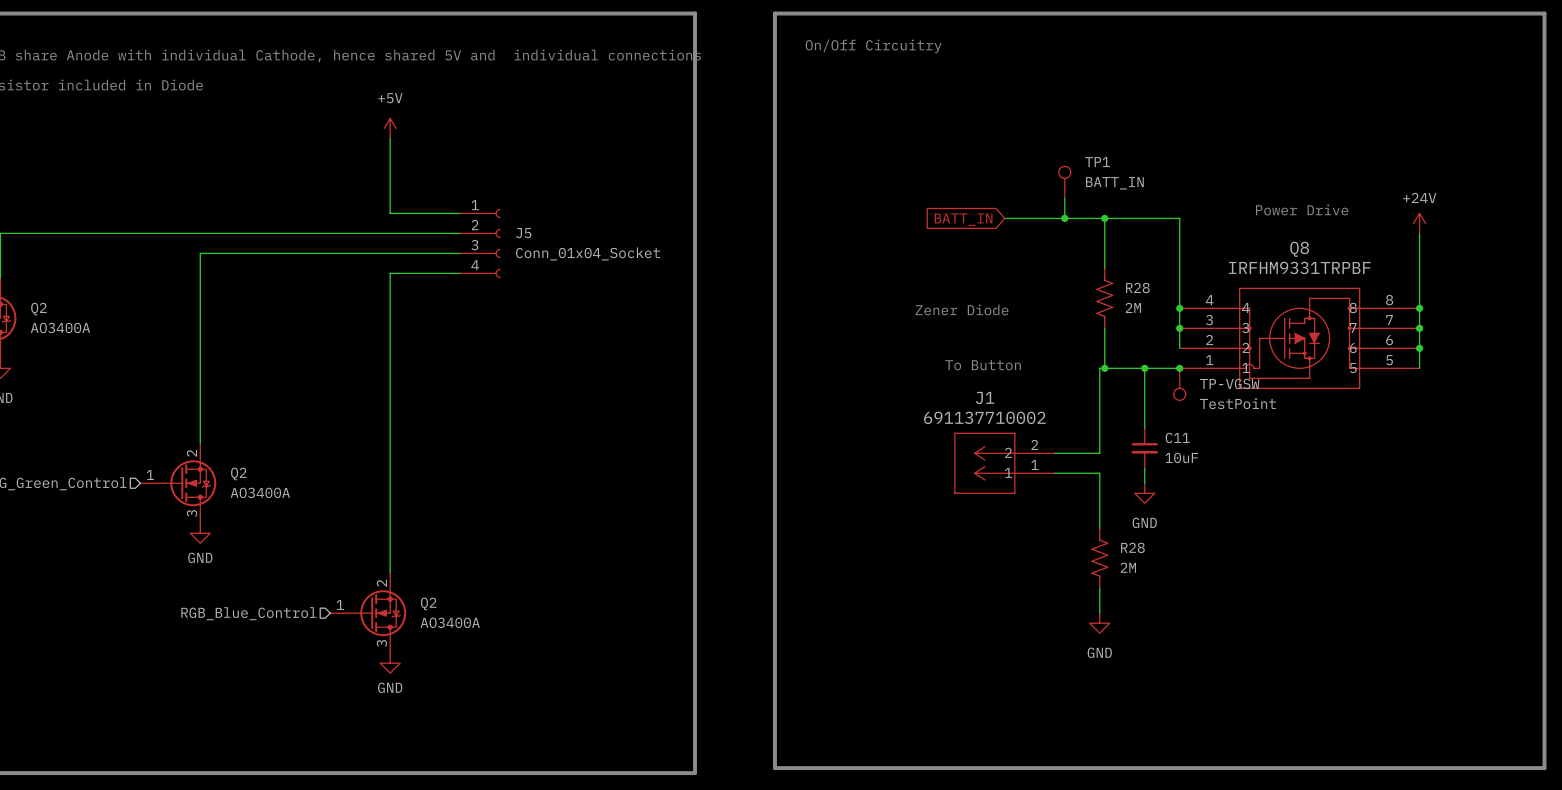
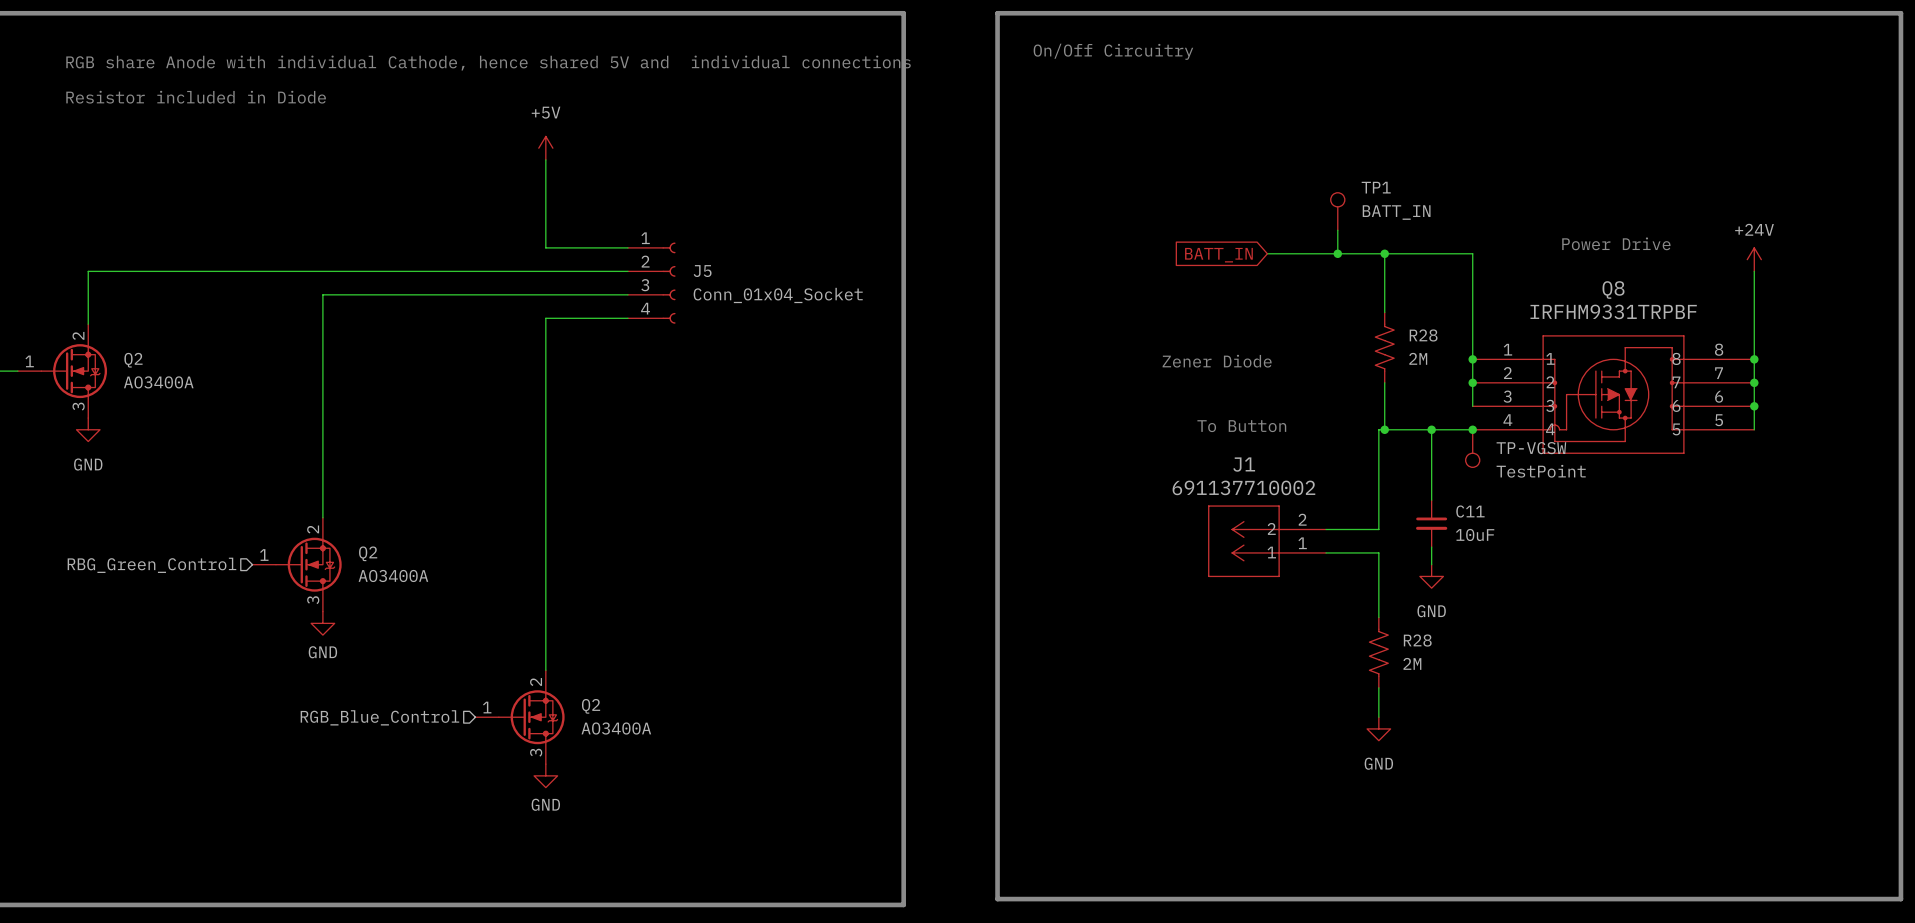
Q8 pin number: 4 (1209, 300) -> 1 (1507, 349)
Q8 pin name: 4 (1245, 308) -> 1 (1550, 358)
Q8 pin number: 3 (1209, 320) -> 2 (1507, 373)
Q8 pin name: 3 (1245, 327) -> 2 (1550, 382)
Q8 pin number: 2 (1209, 340) -> 3 (1507, 396)
Q8 pin name: 2 (1245, 347) -> 3 (1550, 405)
Q8 pin number: 1 (1209, 360) -> 4 (1507, 420)
Q8 pin name: 1 (1246, 367) -> 4 (1550, 429)

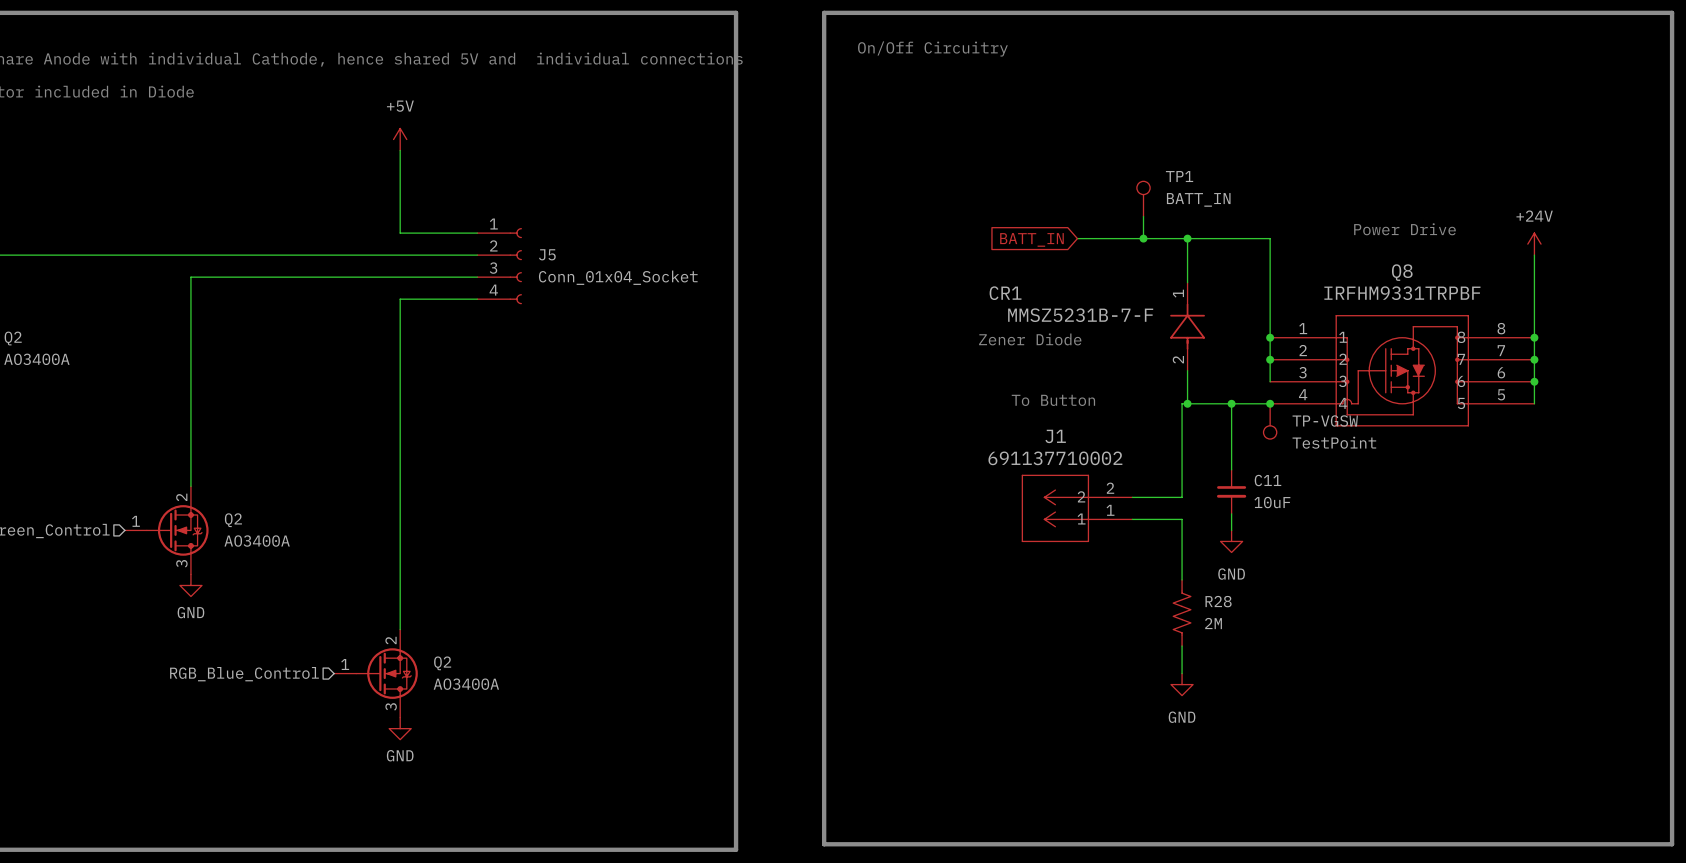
R28: 2M (1384, 347) -> none
CR1: none -> MMSZ5231B-7-F (1187, 326)

